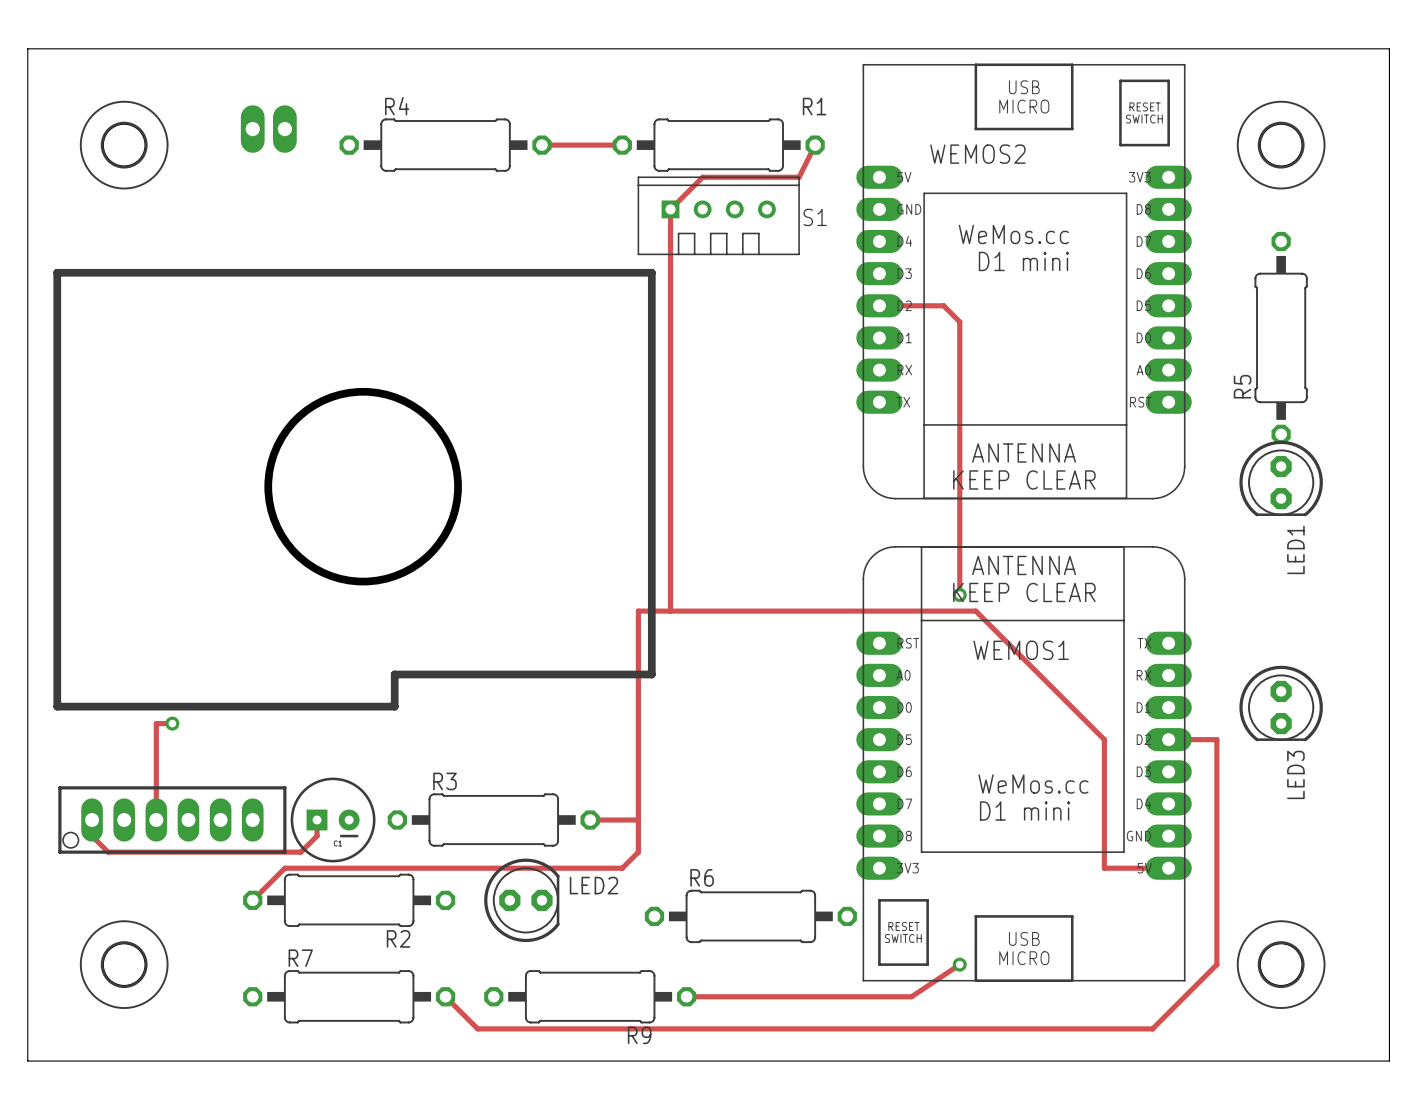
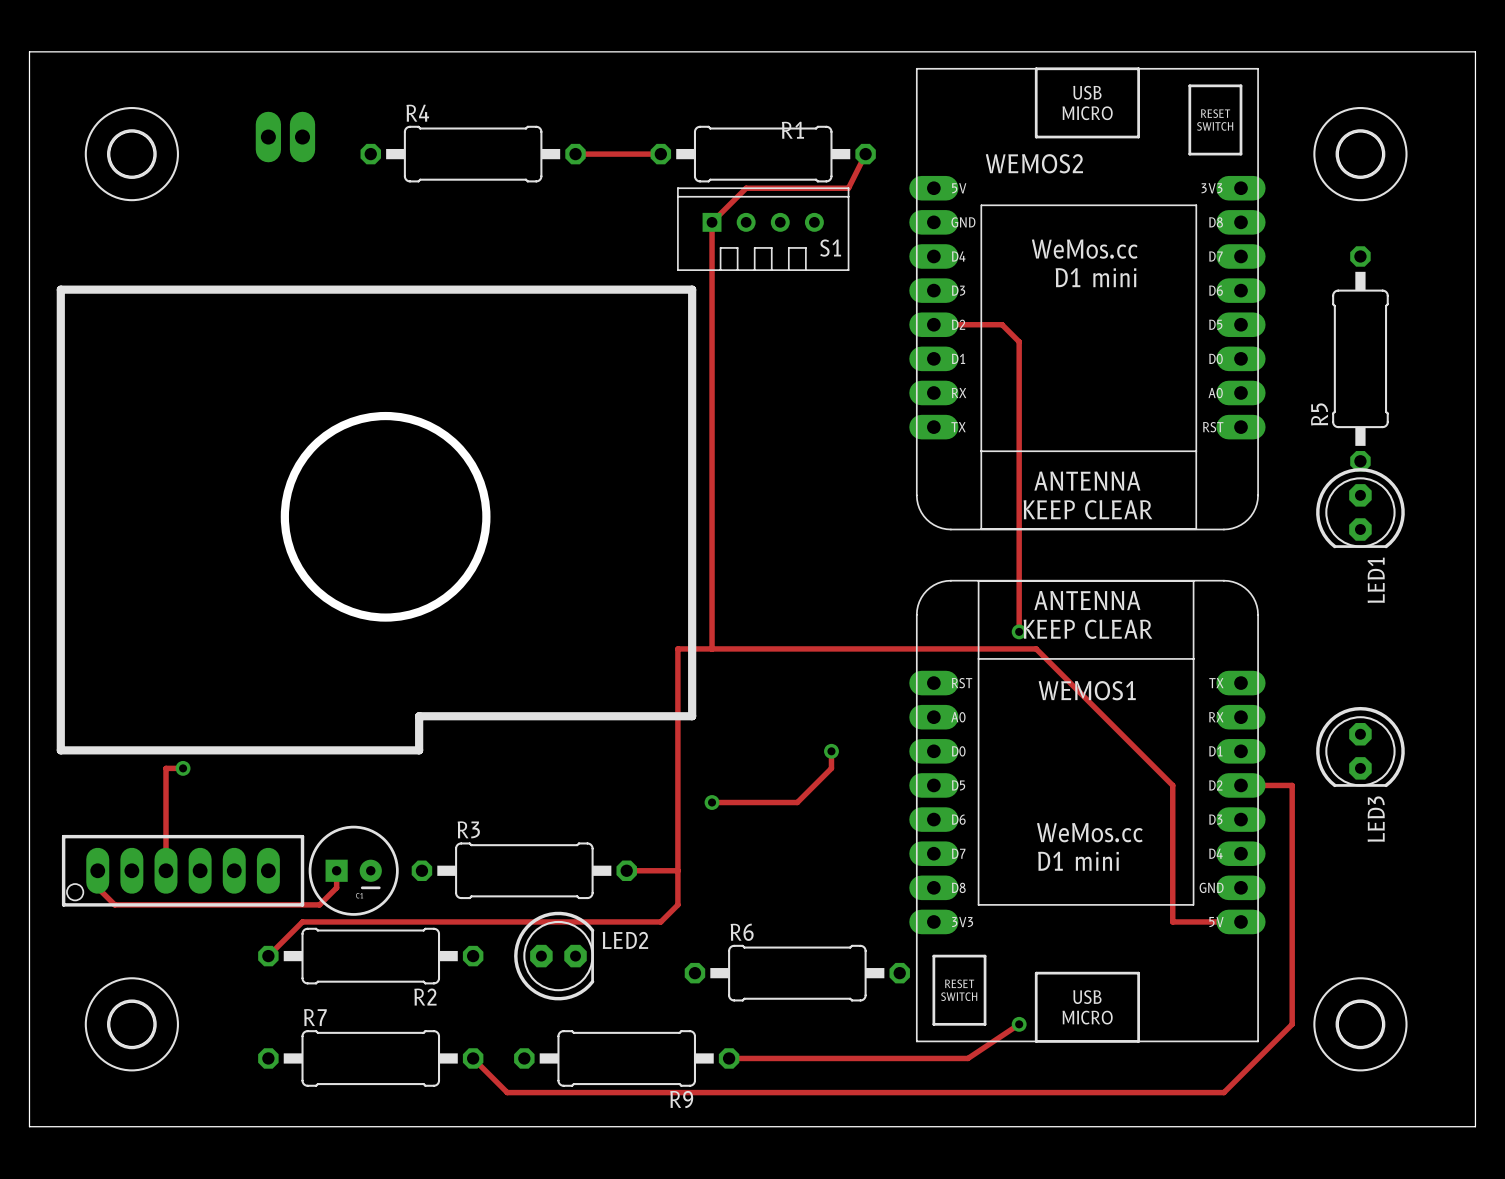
R1 name position: R1 (814, 106) -> R1 (792, 130)
S1 name position: S1 (815, 217) -> S1 (830, 248)
track: none -> (831, 751) (831, 768) (797, 802) (712, 802)
via: none -> (831, 751)
via: none -> (712, 802)

